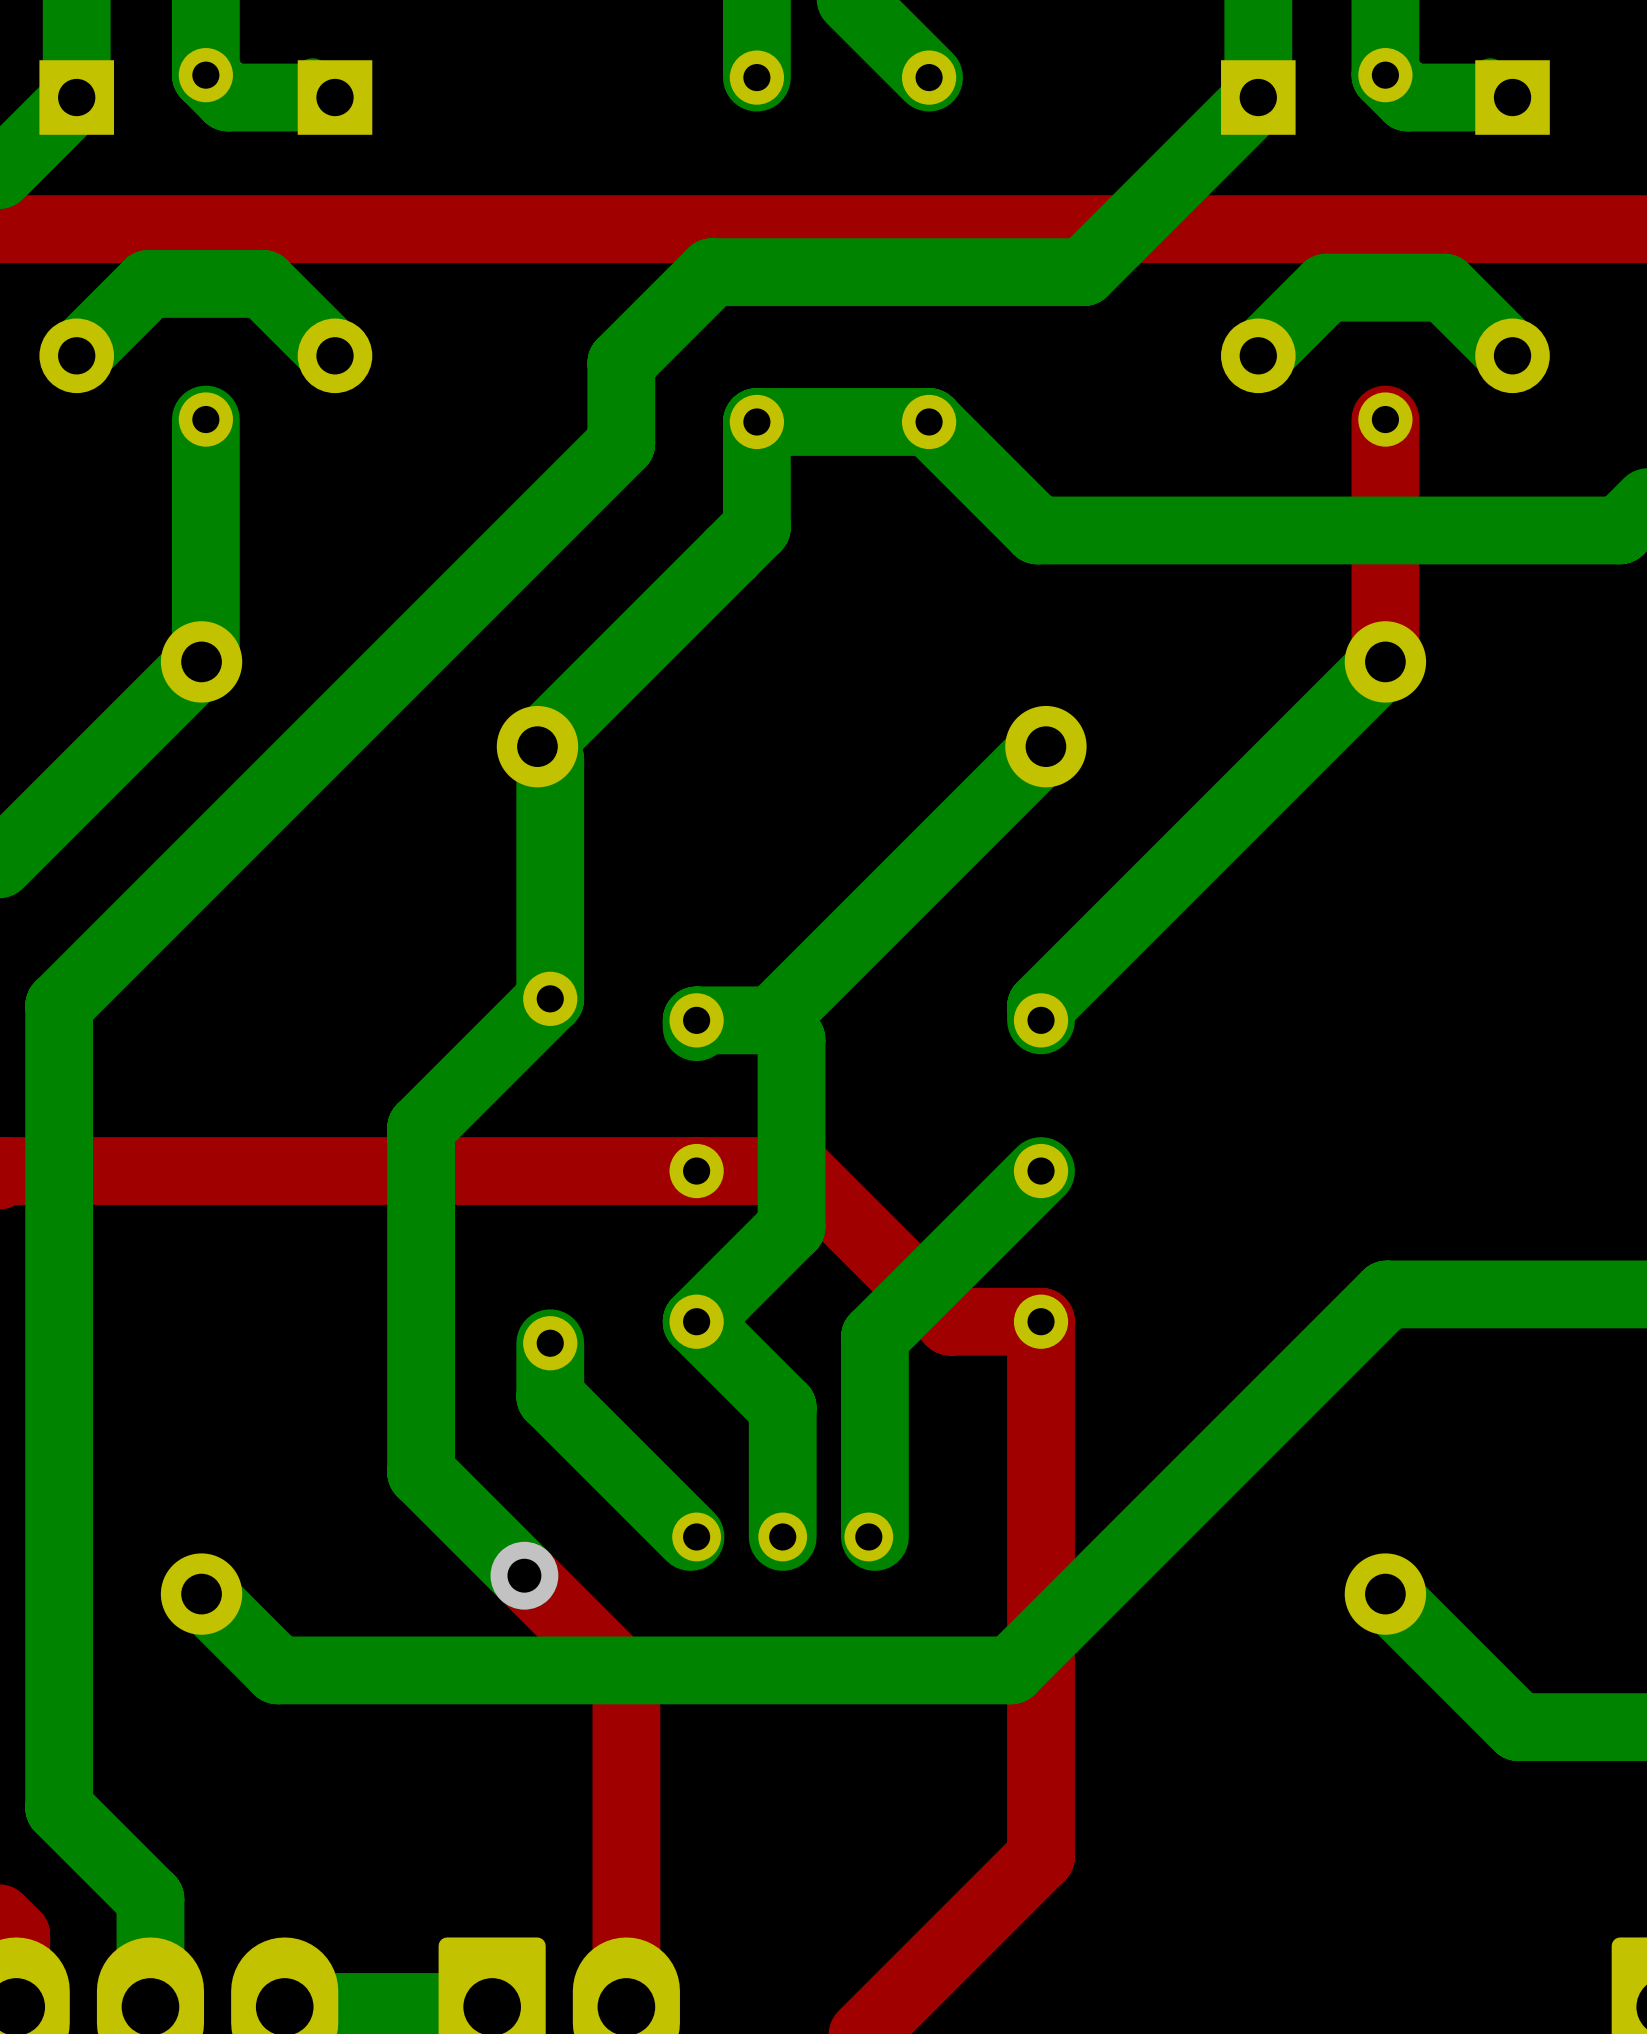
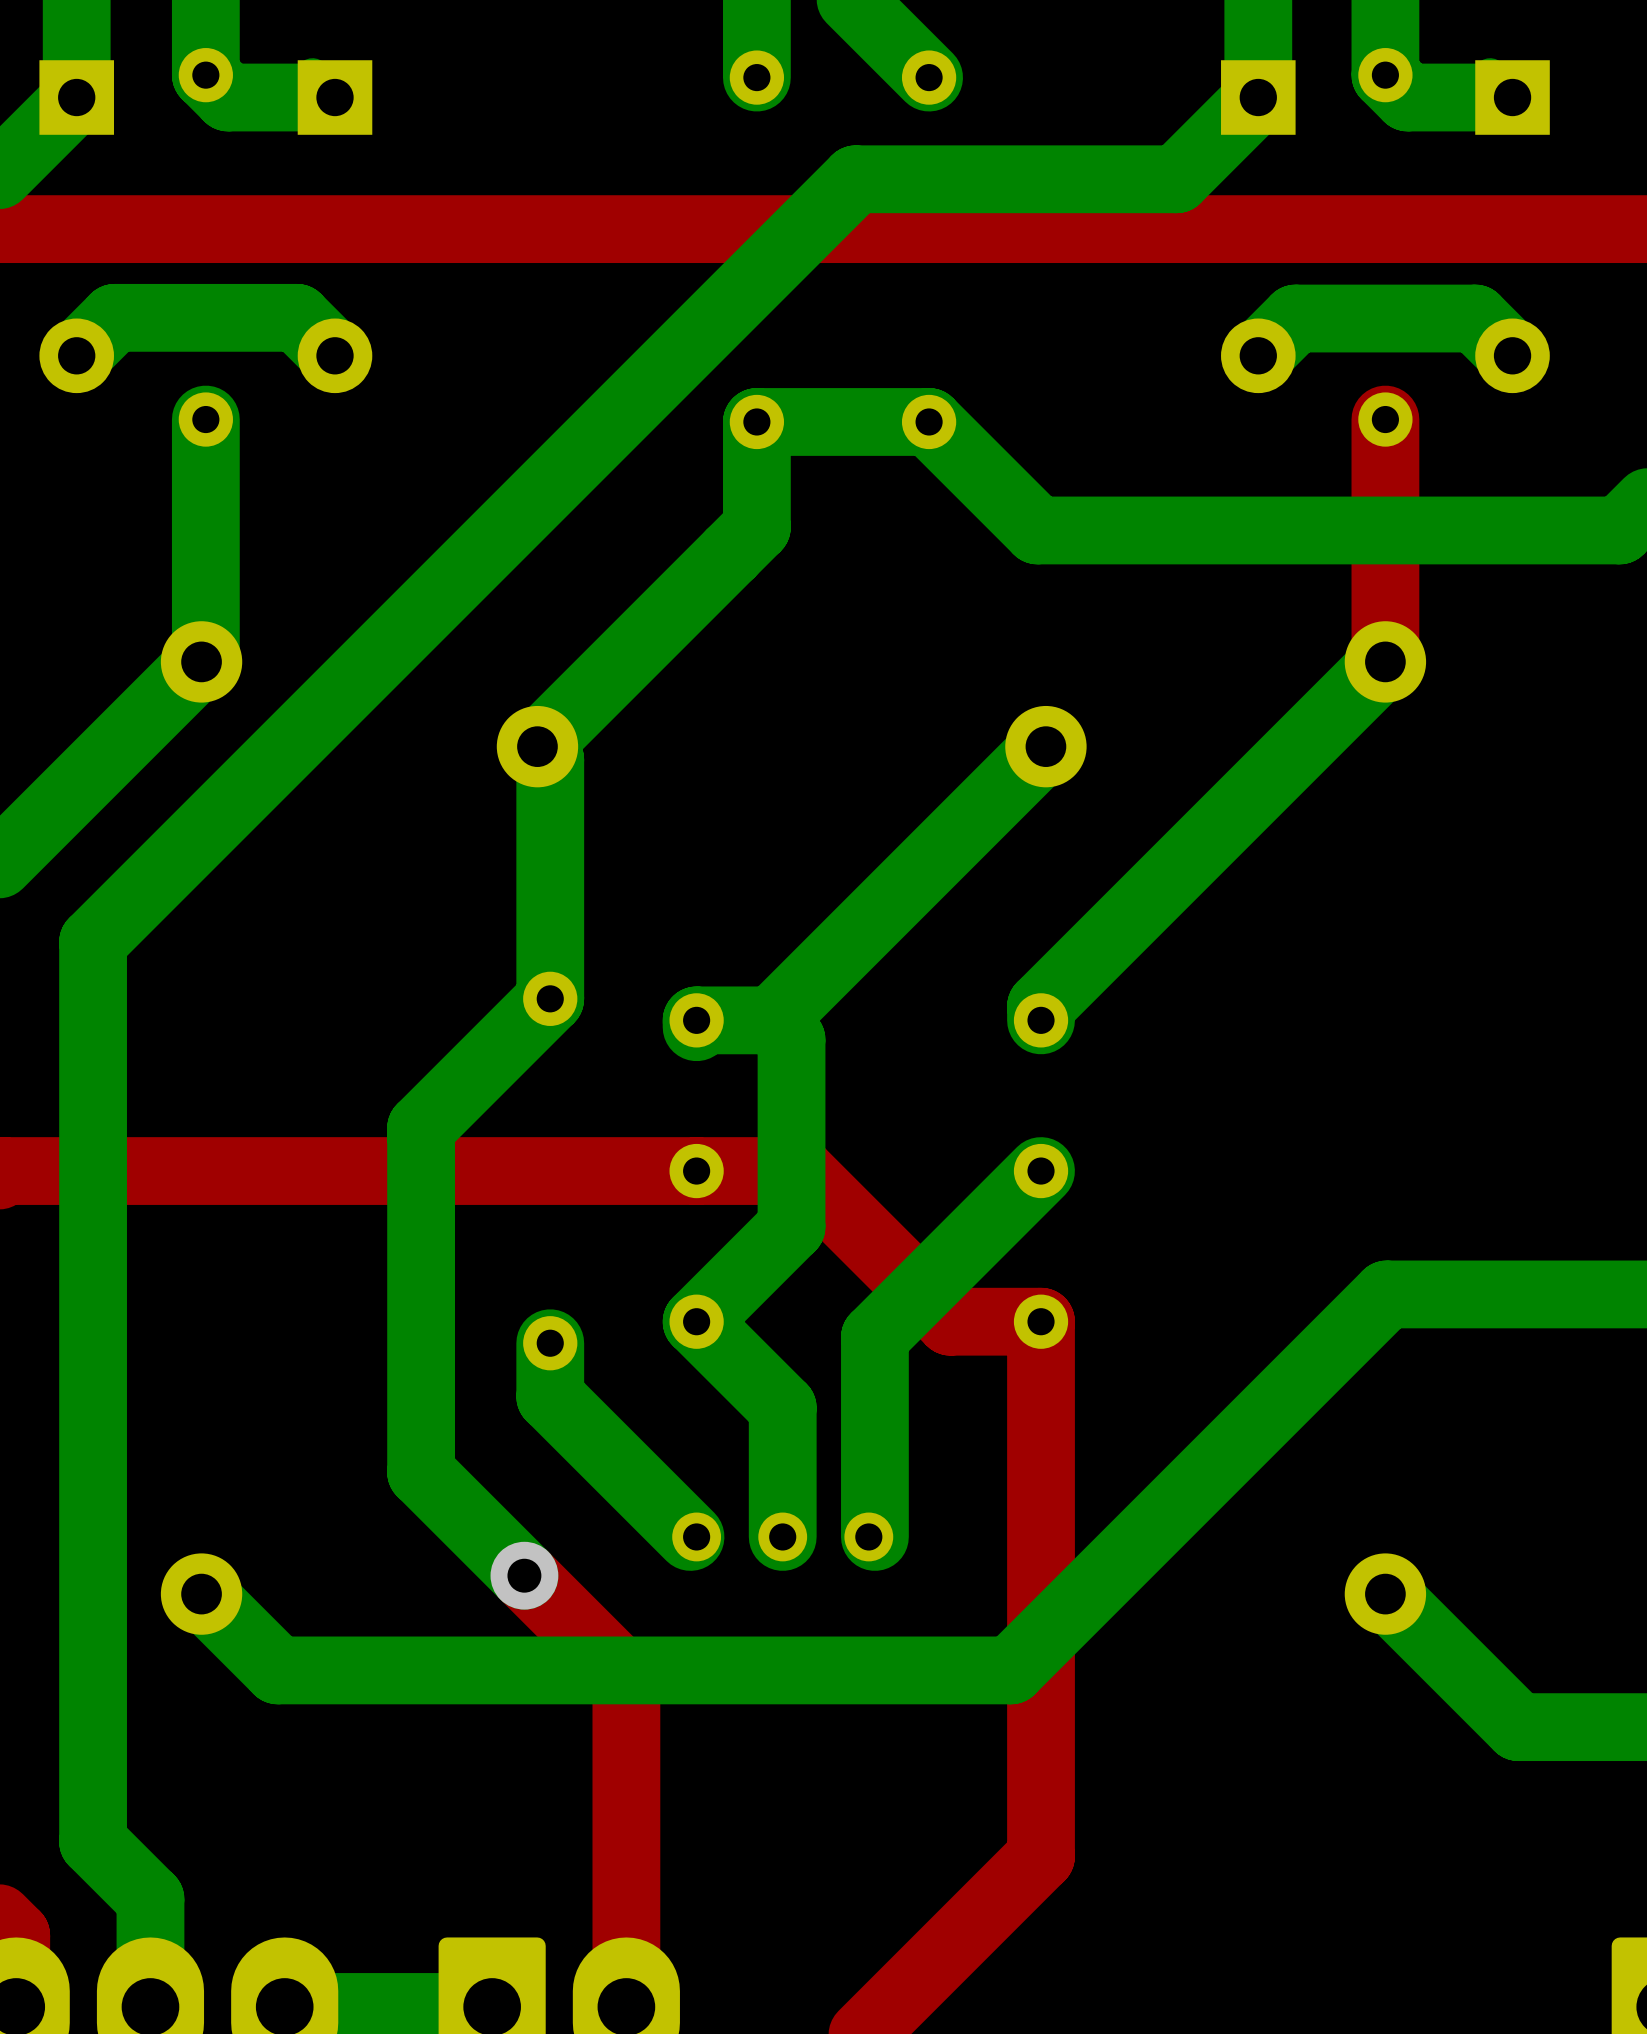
bottom track: (1176, 179) (1083, 272) (712, 272) (621, 362) (621, 443) (59, 1005) (59, 1807) (93, 1841) -> (1176, 179) (855, 179) (93, 941) (93, 1841)
bottom track: (297, 317) (263, 283) (148, 283) (114, 317) -> (297, 317) (114, 317)
bottom track: (1475, 318) (1444, 287) (1326, 287) (1295, 318) -> (1475, 318) (1295, 318)

